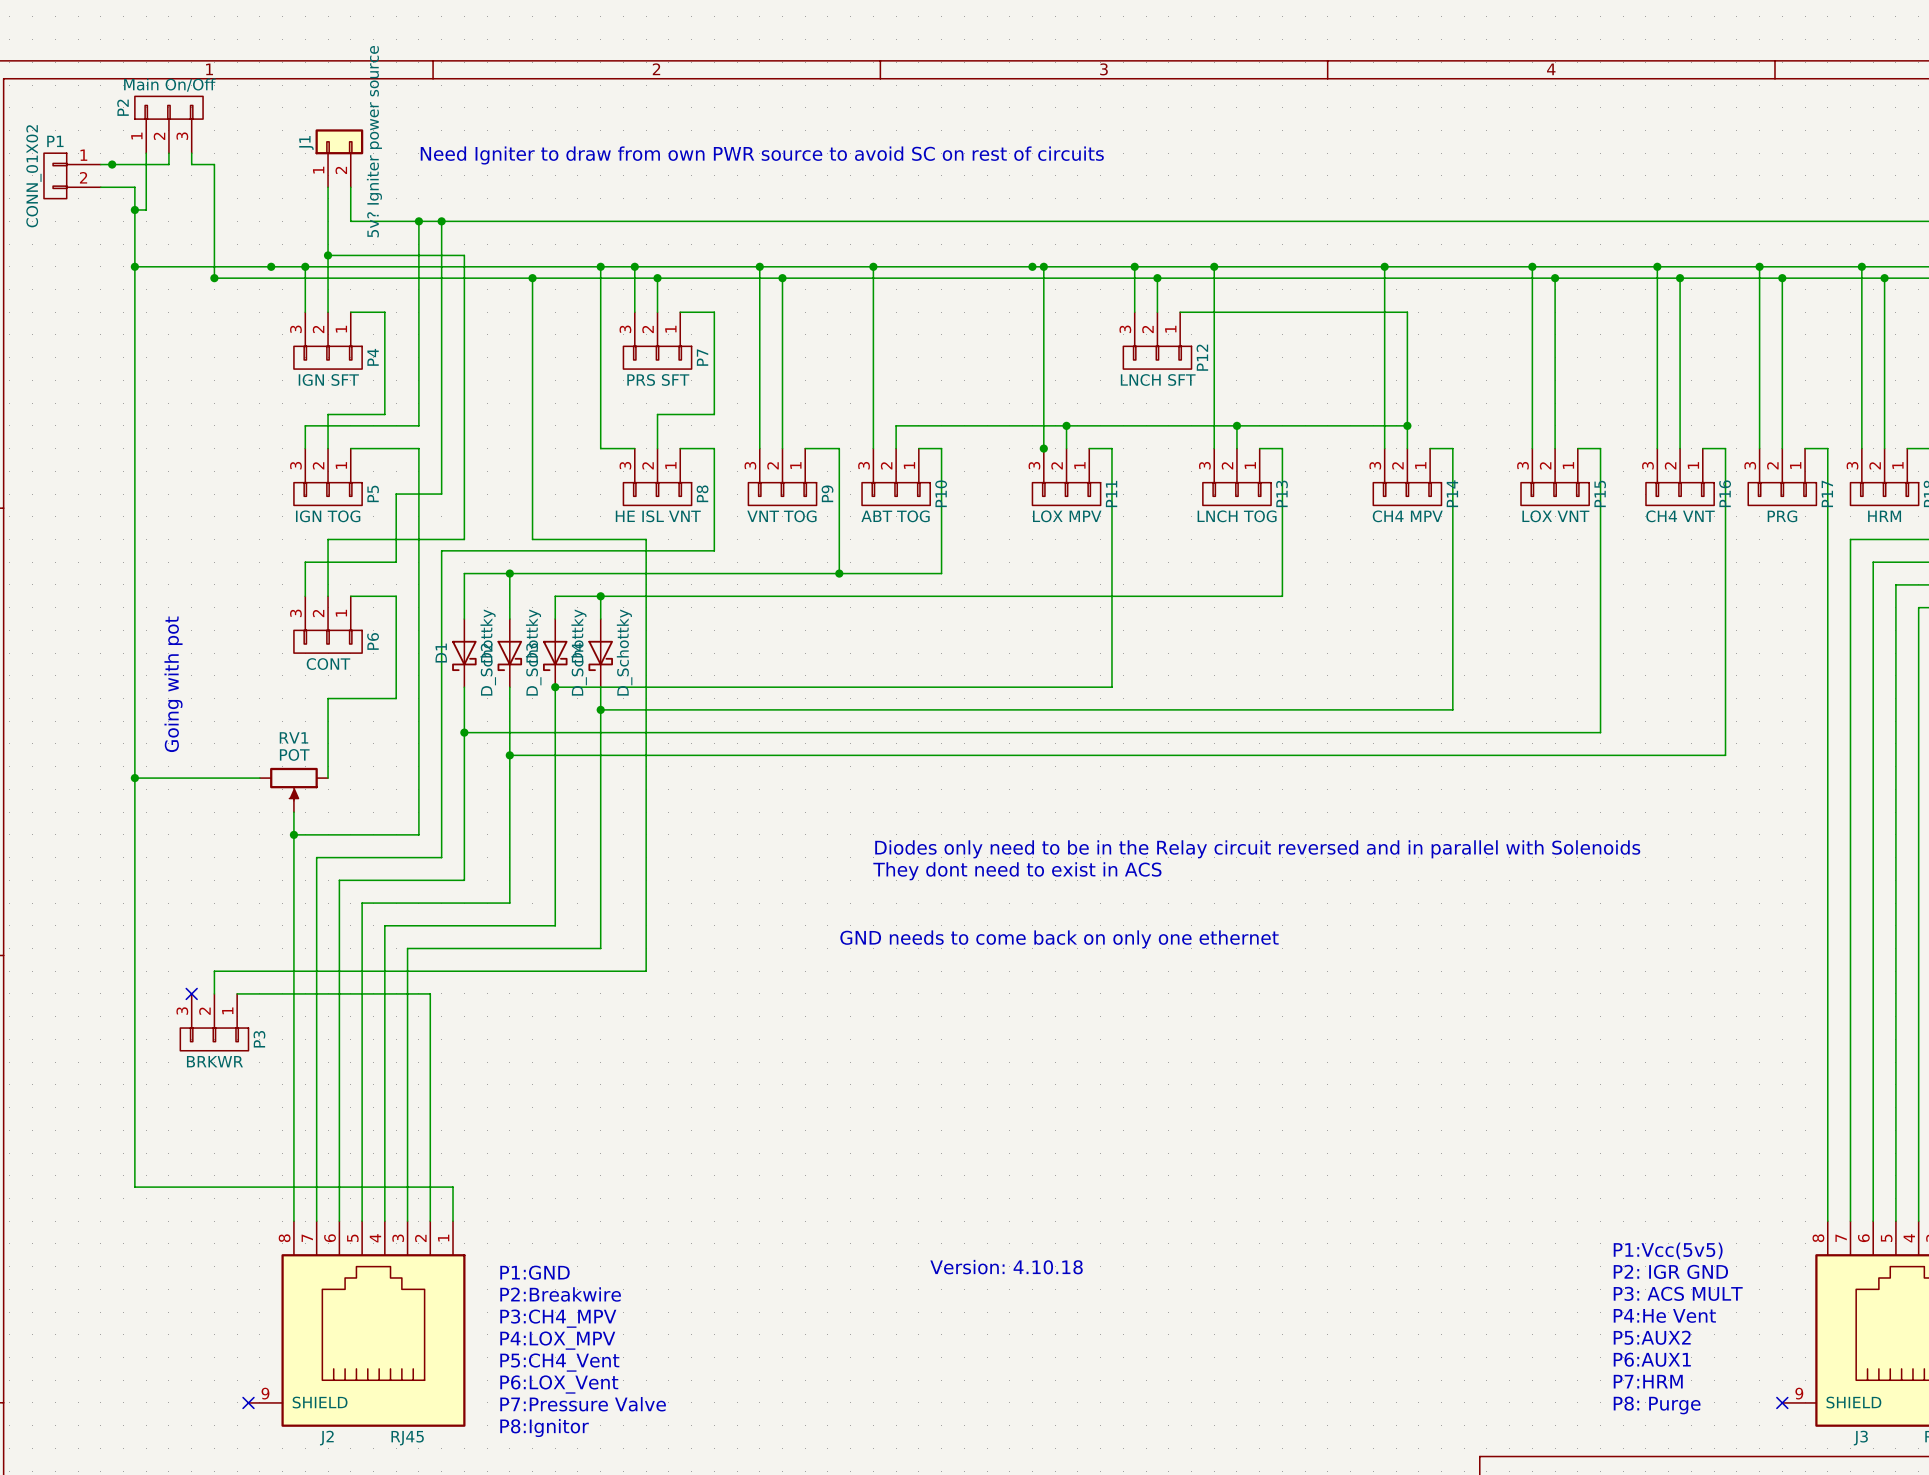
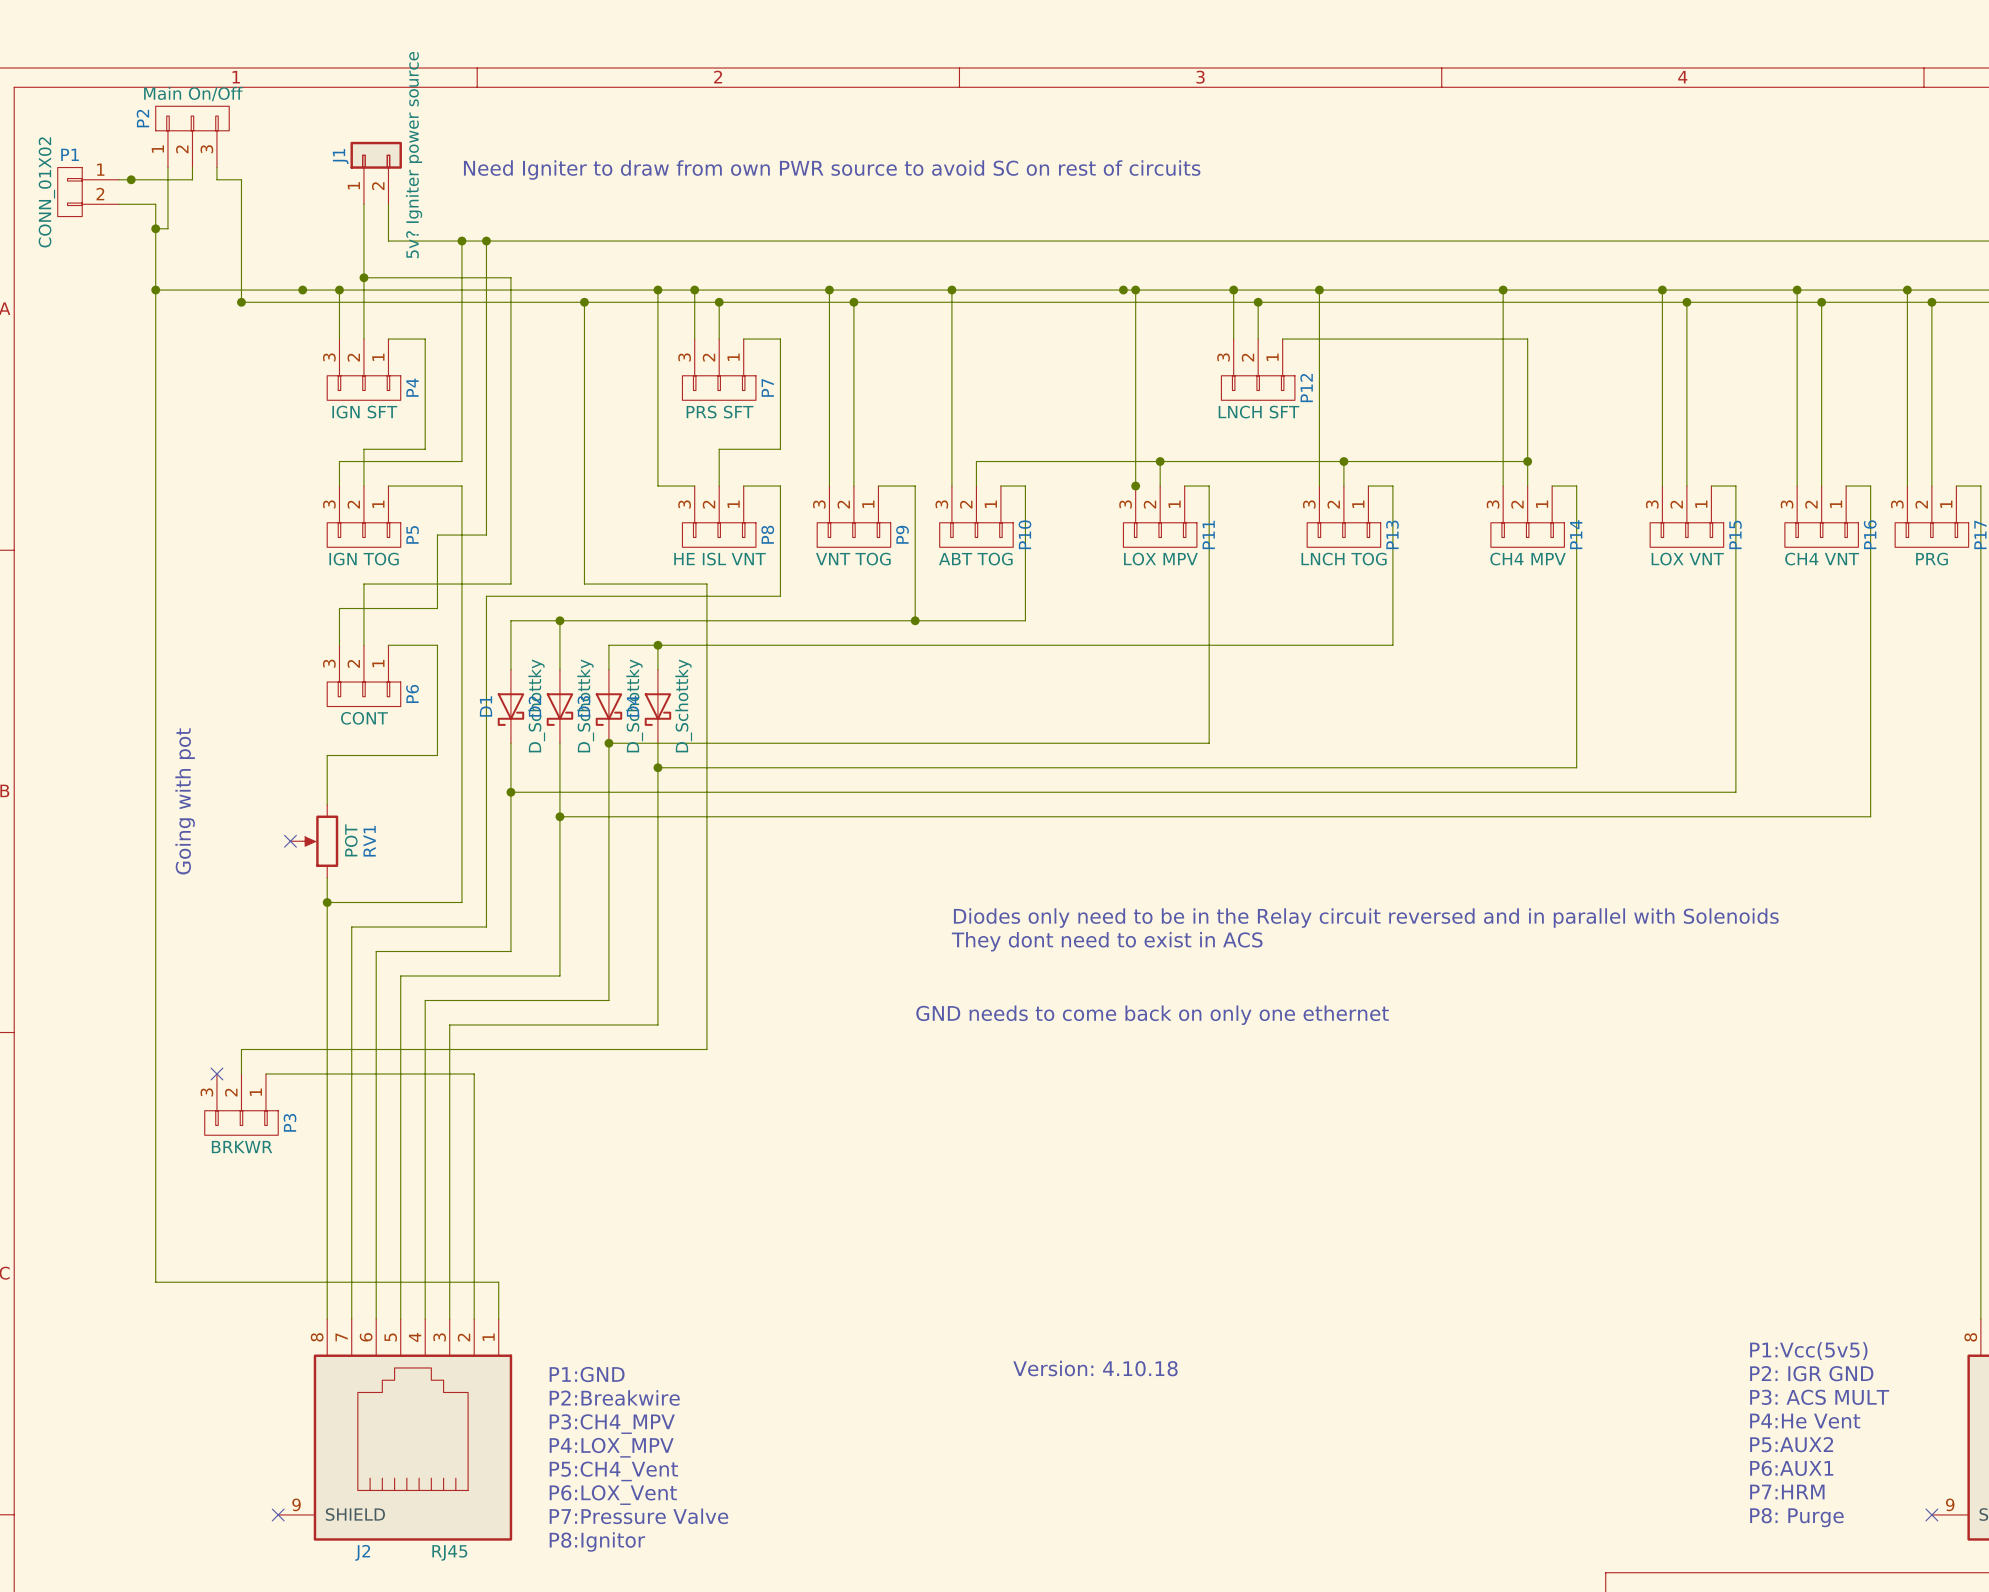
text position: Going with pot (173, 684) -> Going with pot (185, 801)
wire: (328, 698) (328, 778) -> (363, 755) (327, 755) (327, 804)
wire: (134, 778) (259, 778) -> none
junction: (134, 778) -> none
no-connect mark: none -> (290, 841)
RV1 rotation: 0° (293, 784) -> 90° clockwise (320, 841)

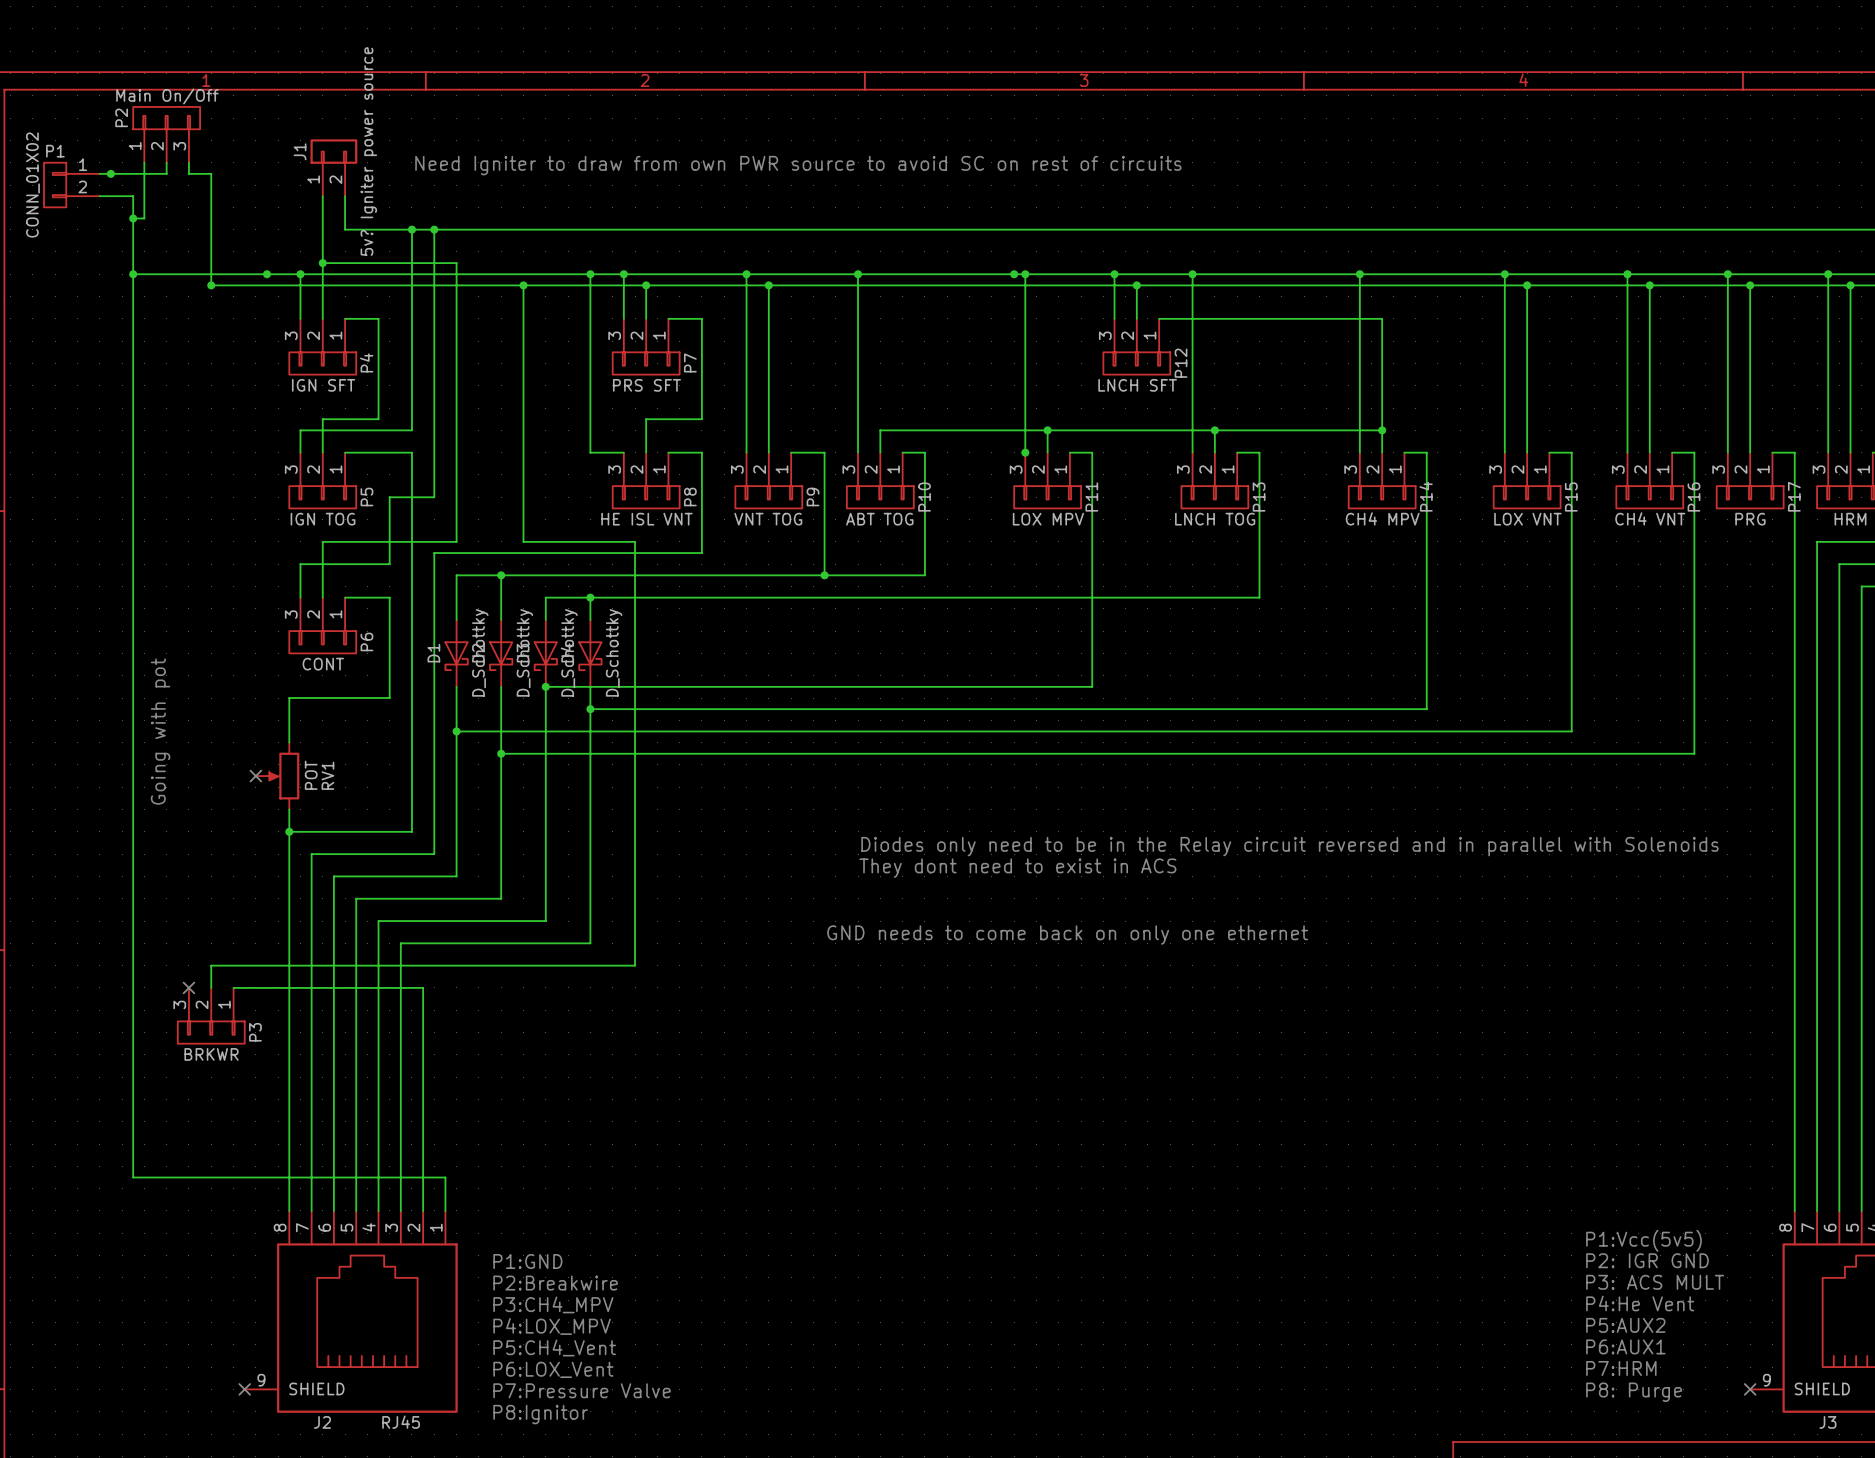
text: Version: 4.10.18 (1095, 1368) -> none

